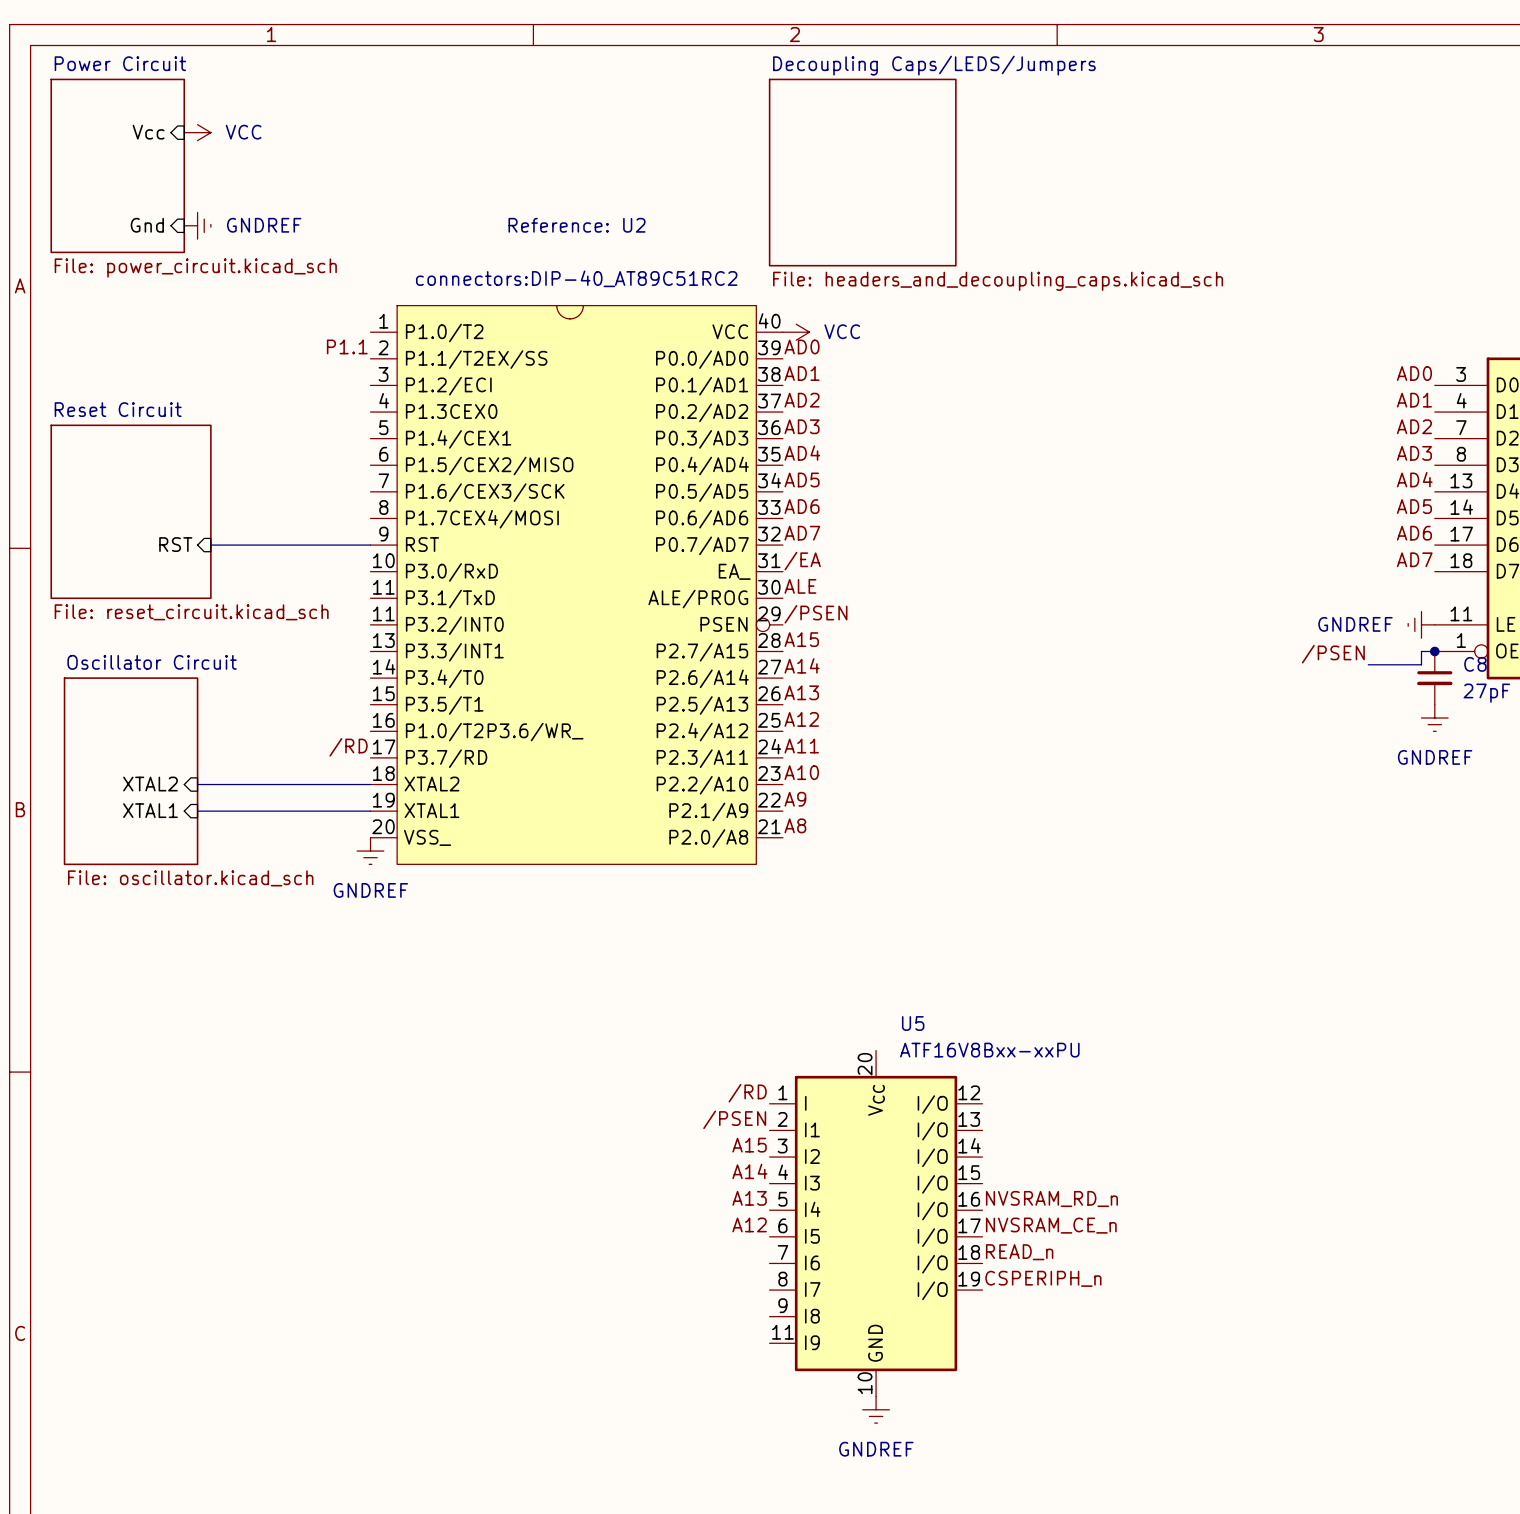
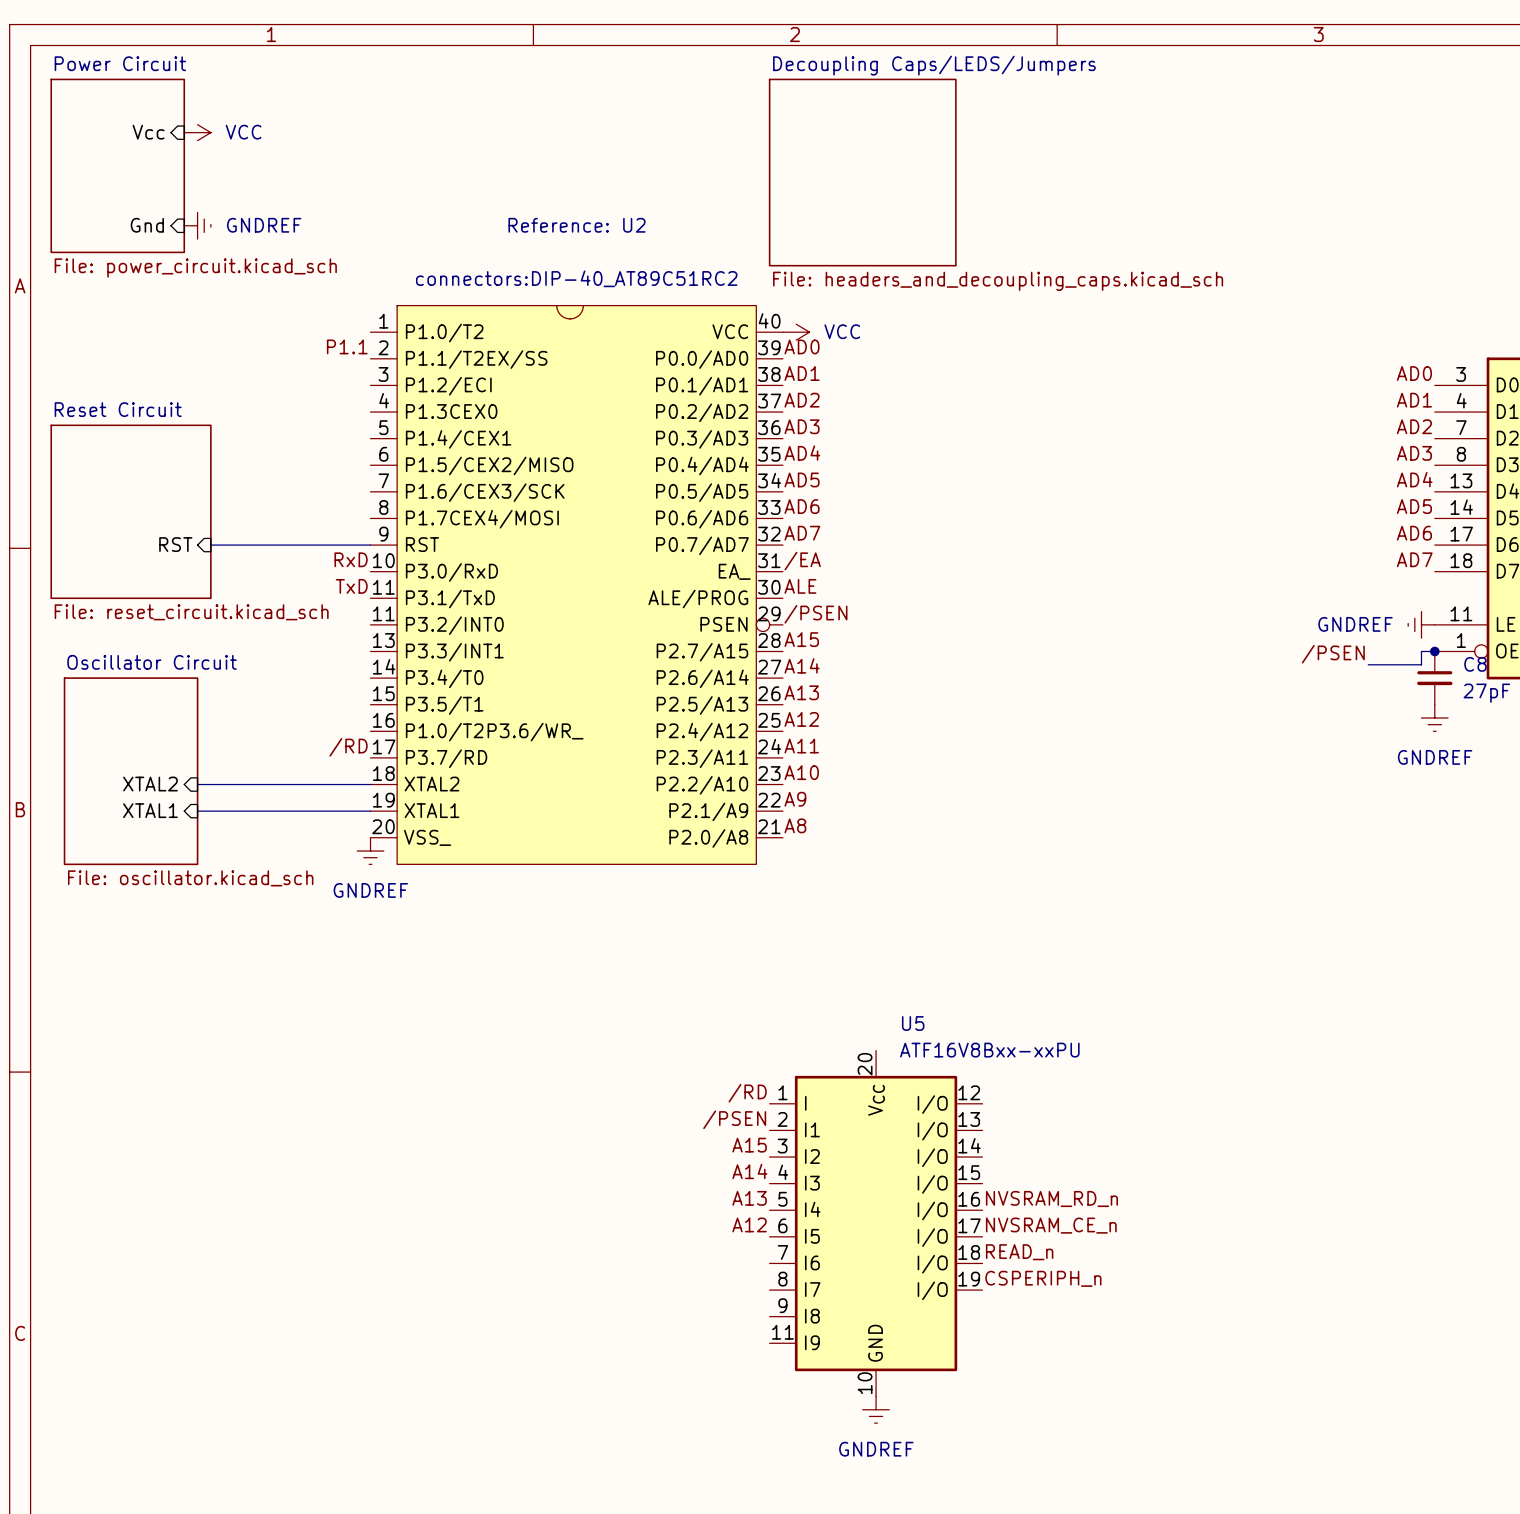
label: none -> RxD (351, 559)
label: none -> TxD (351, 586)

